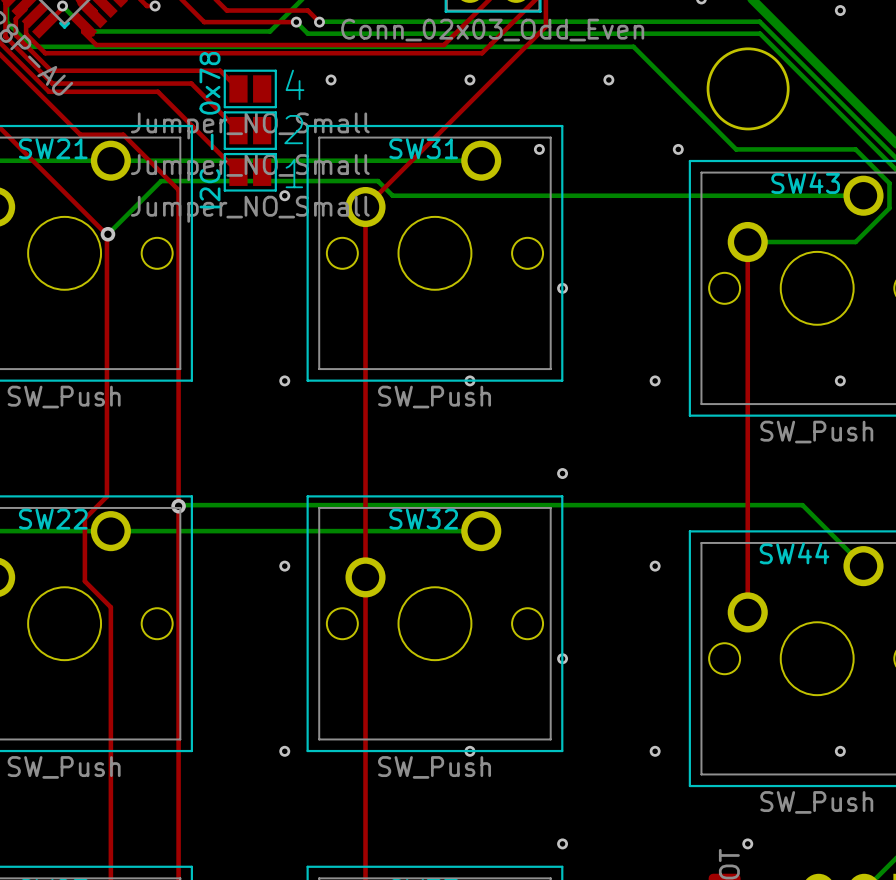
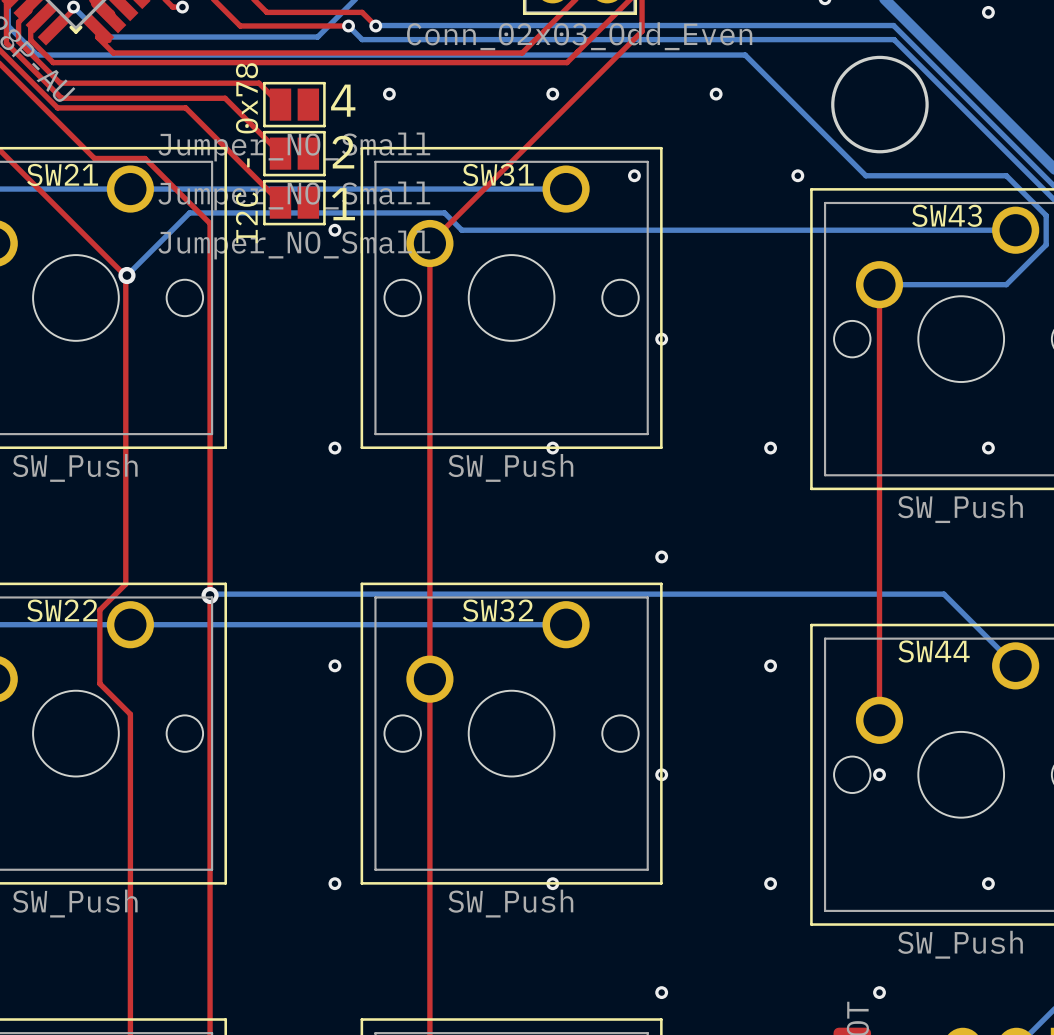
via: none -> (879, 774)

